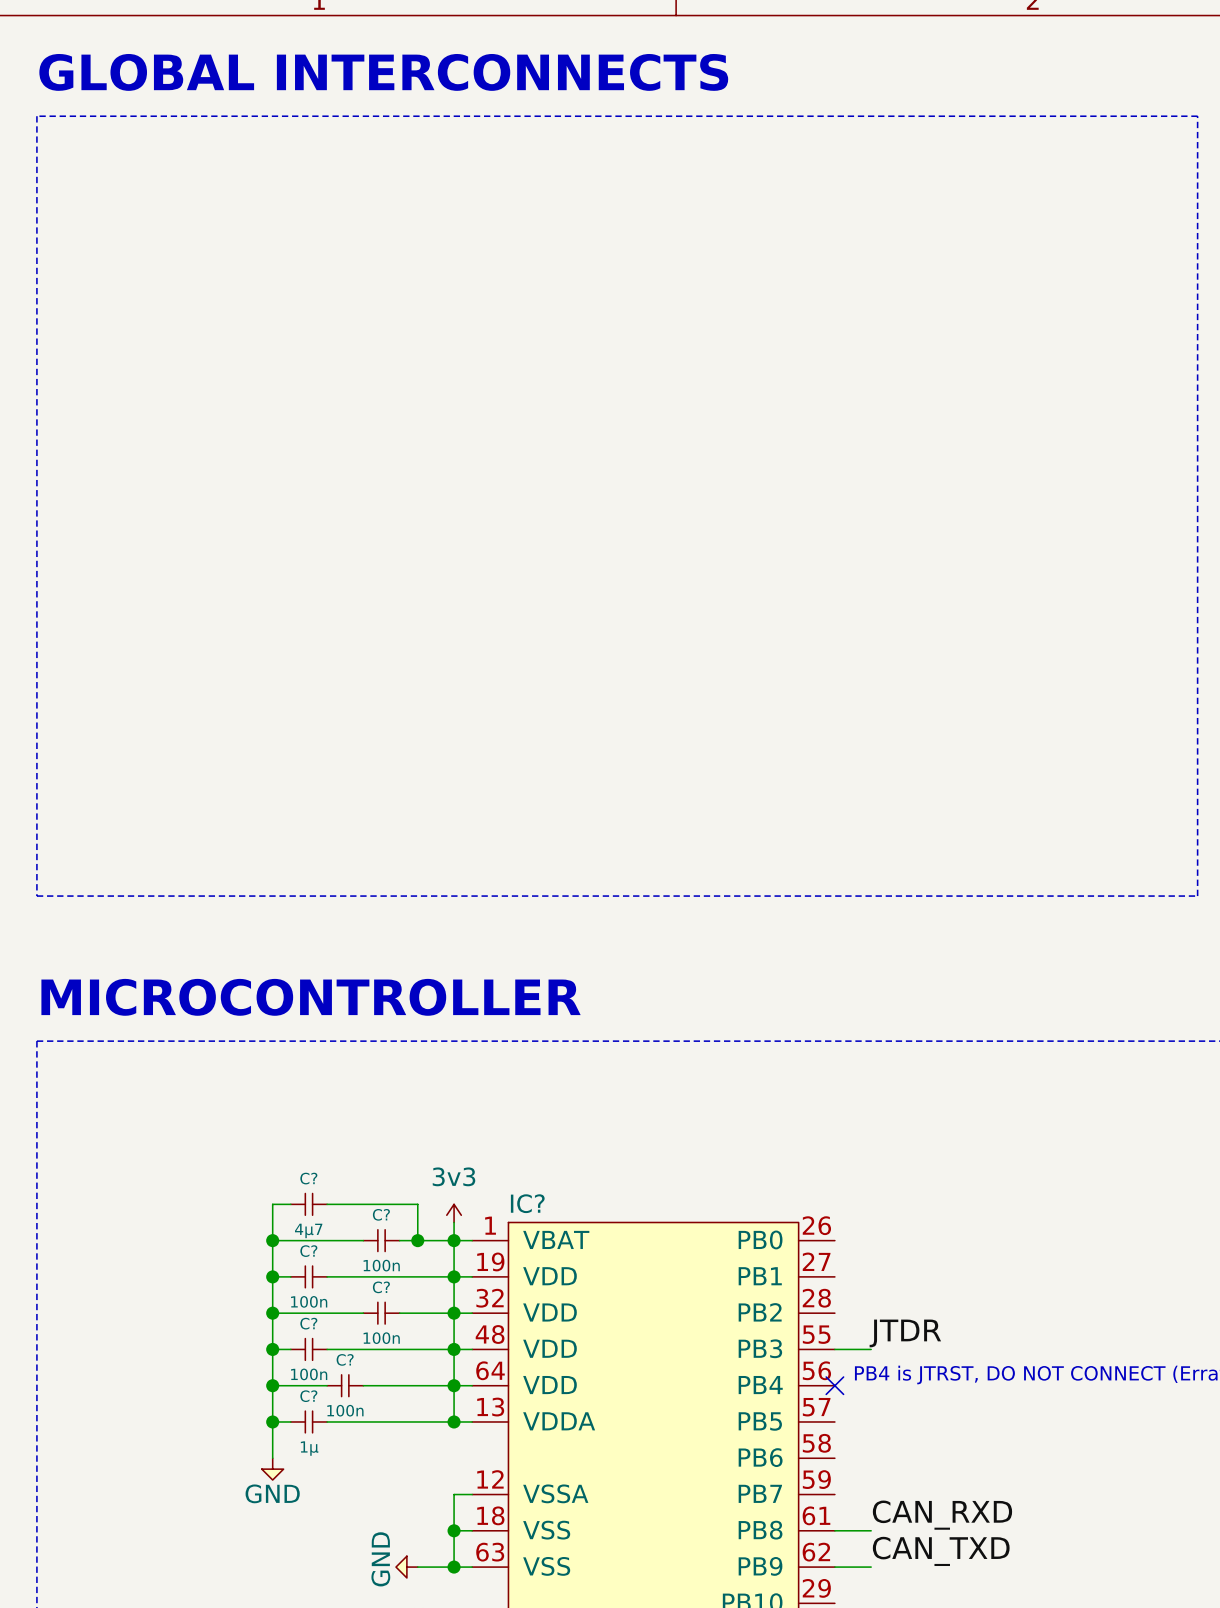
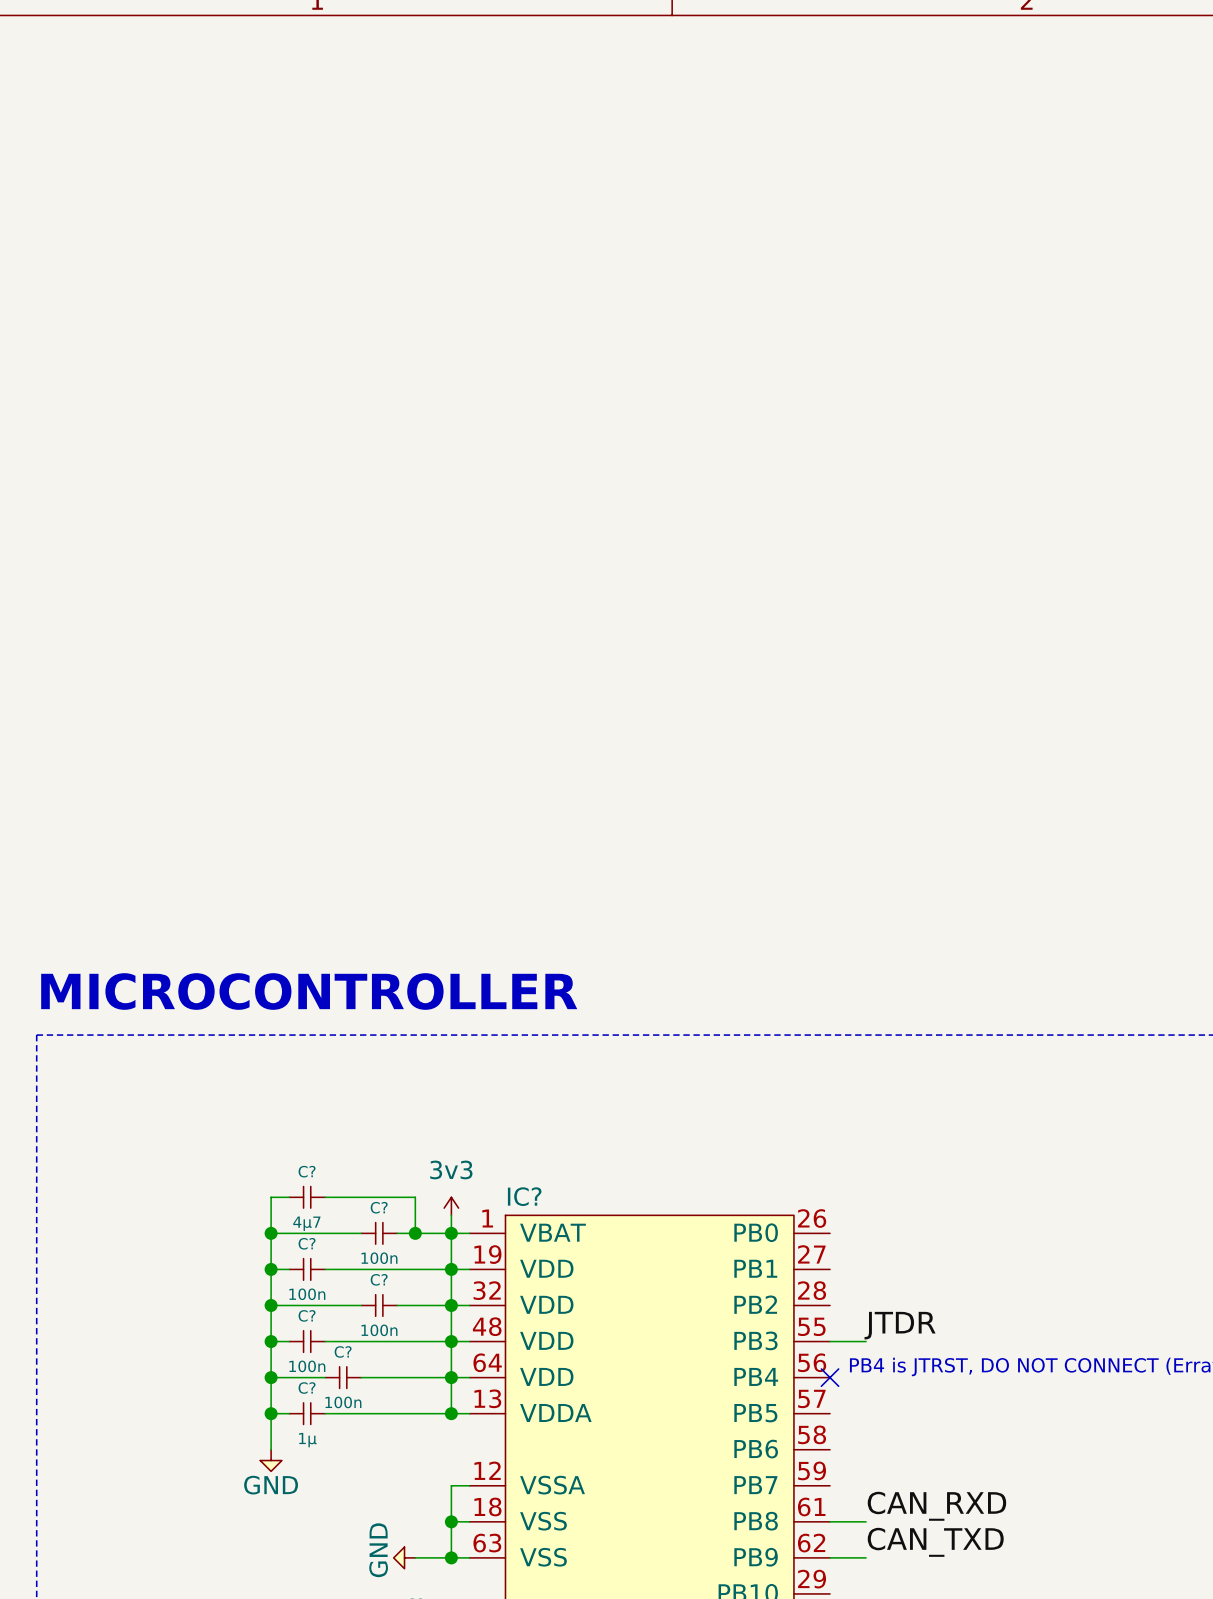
text: GLOBAL INTERCONNECTS (383, 72) -> none
line: (36, 116) (1197, 116) (1197, 896) (36, 896) (36, 116) -> none

